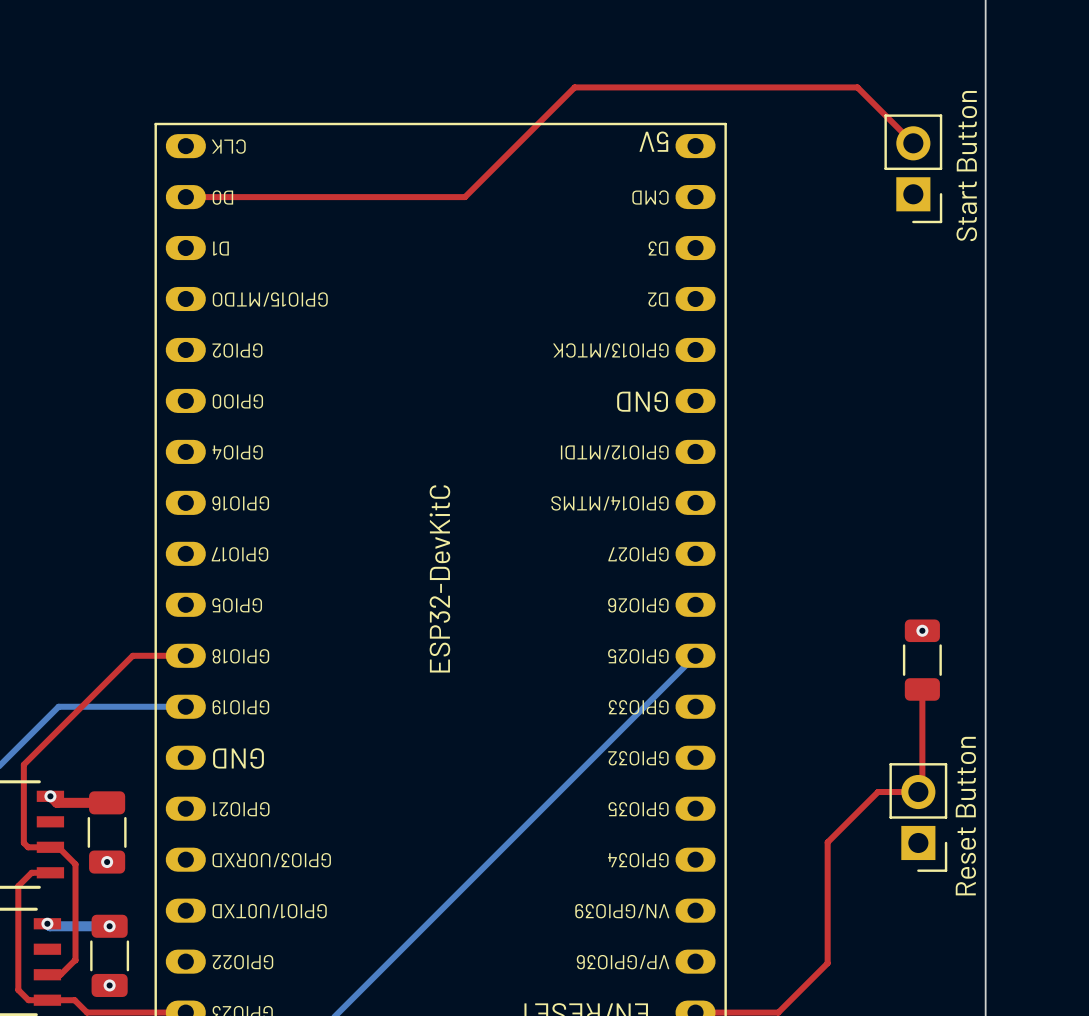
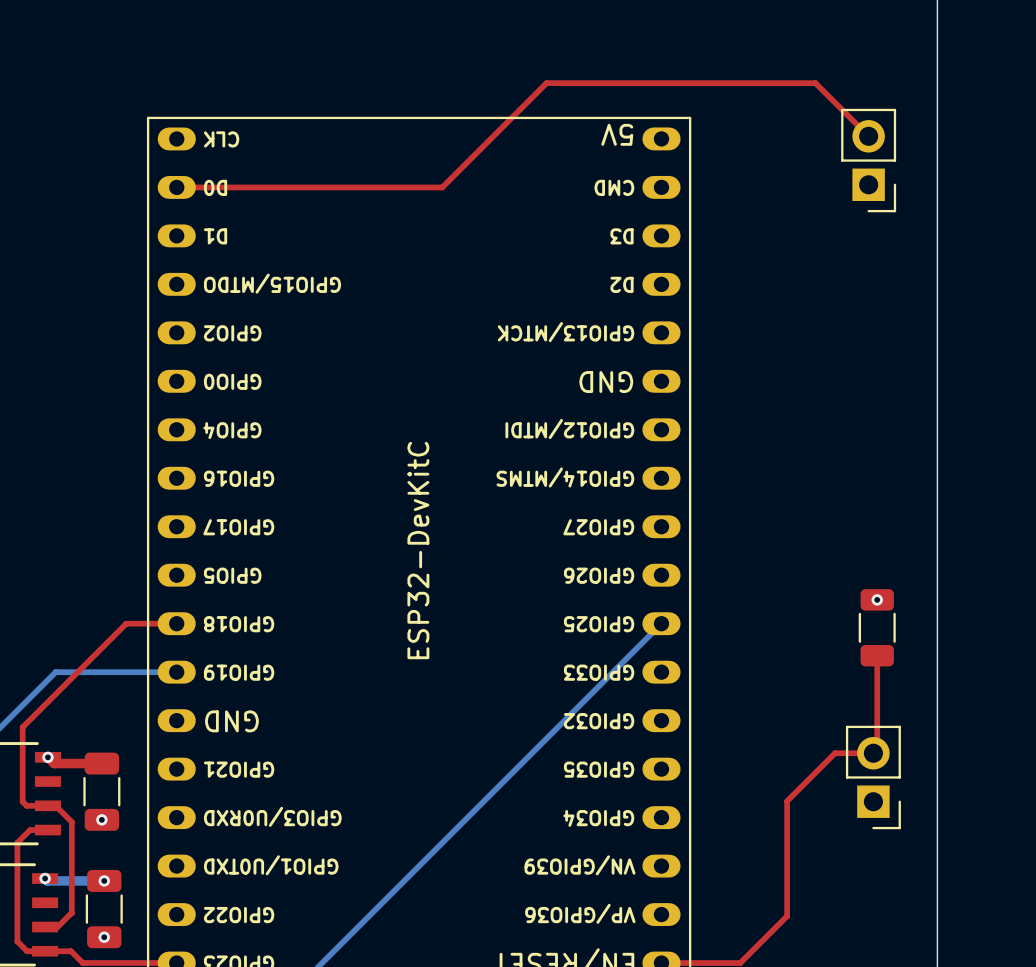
part value: Start Button (966, 166) -> none
part value: Reset Button (965, 816) -> none

